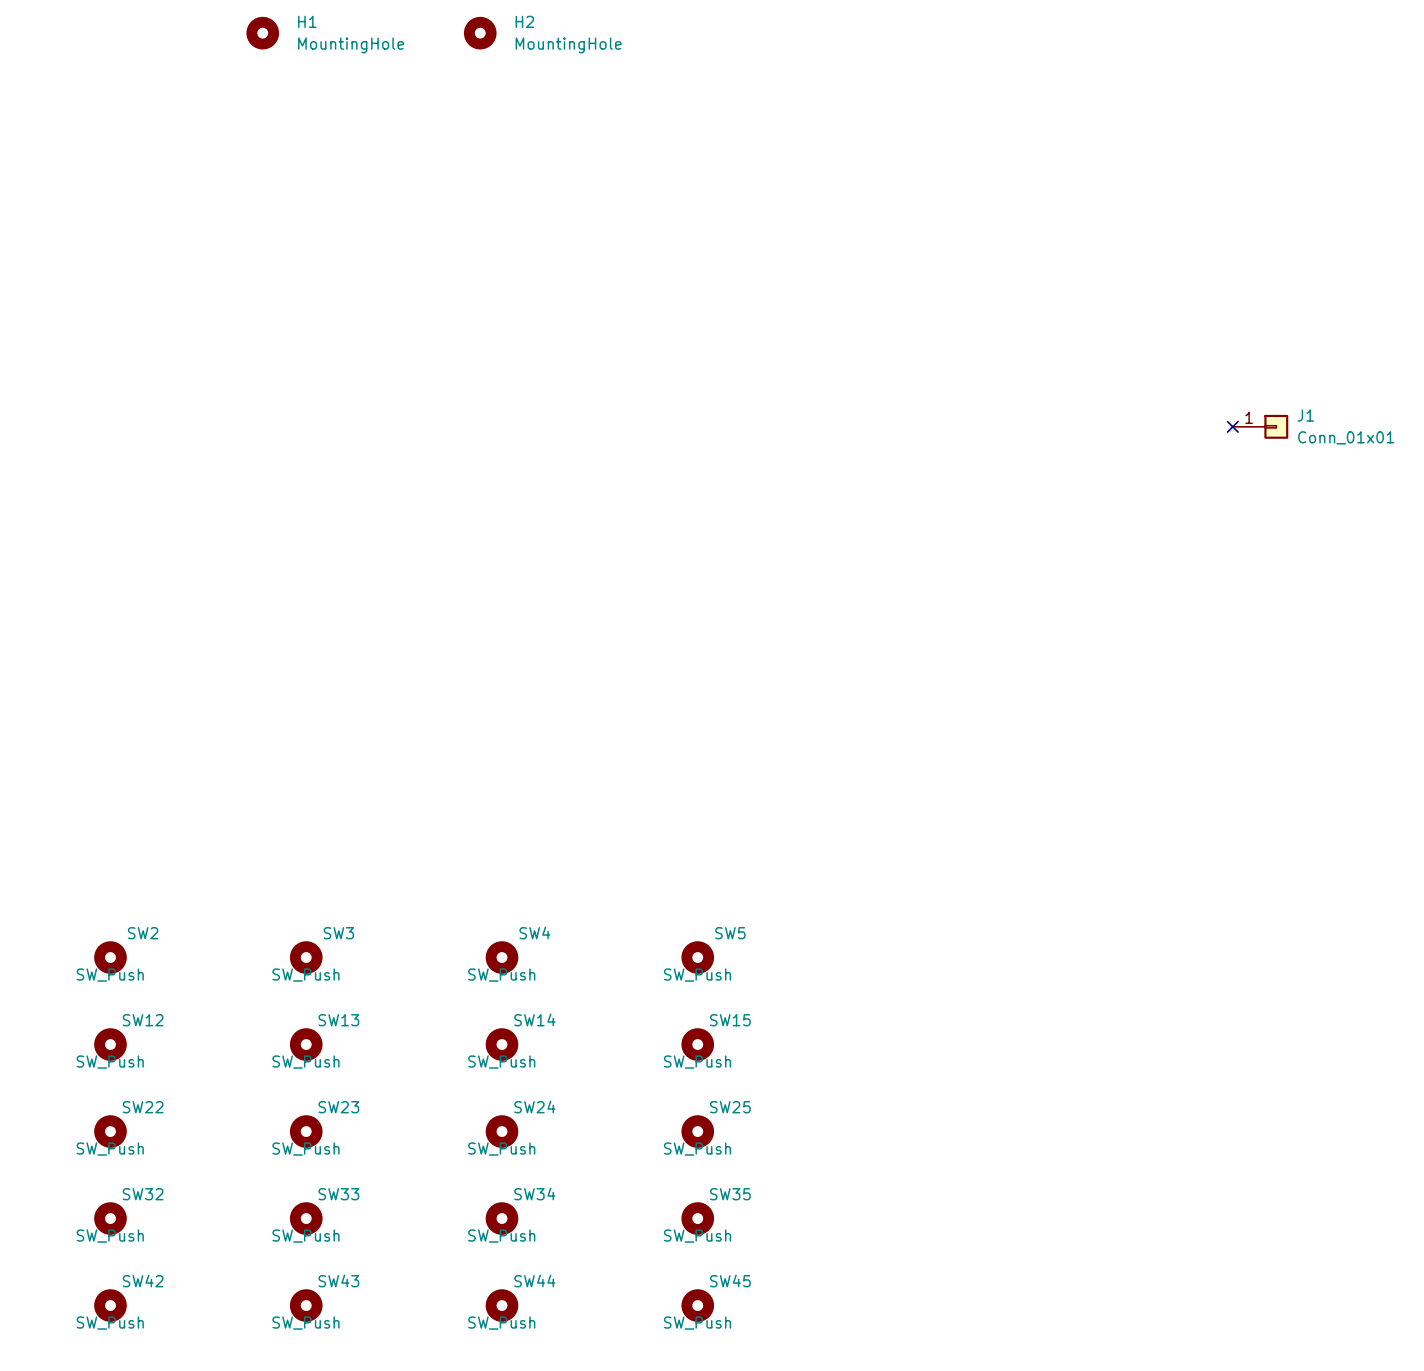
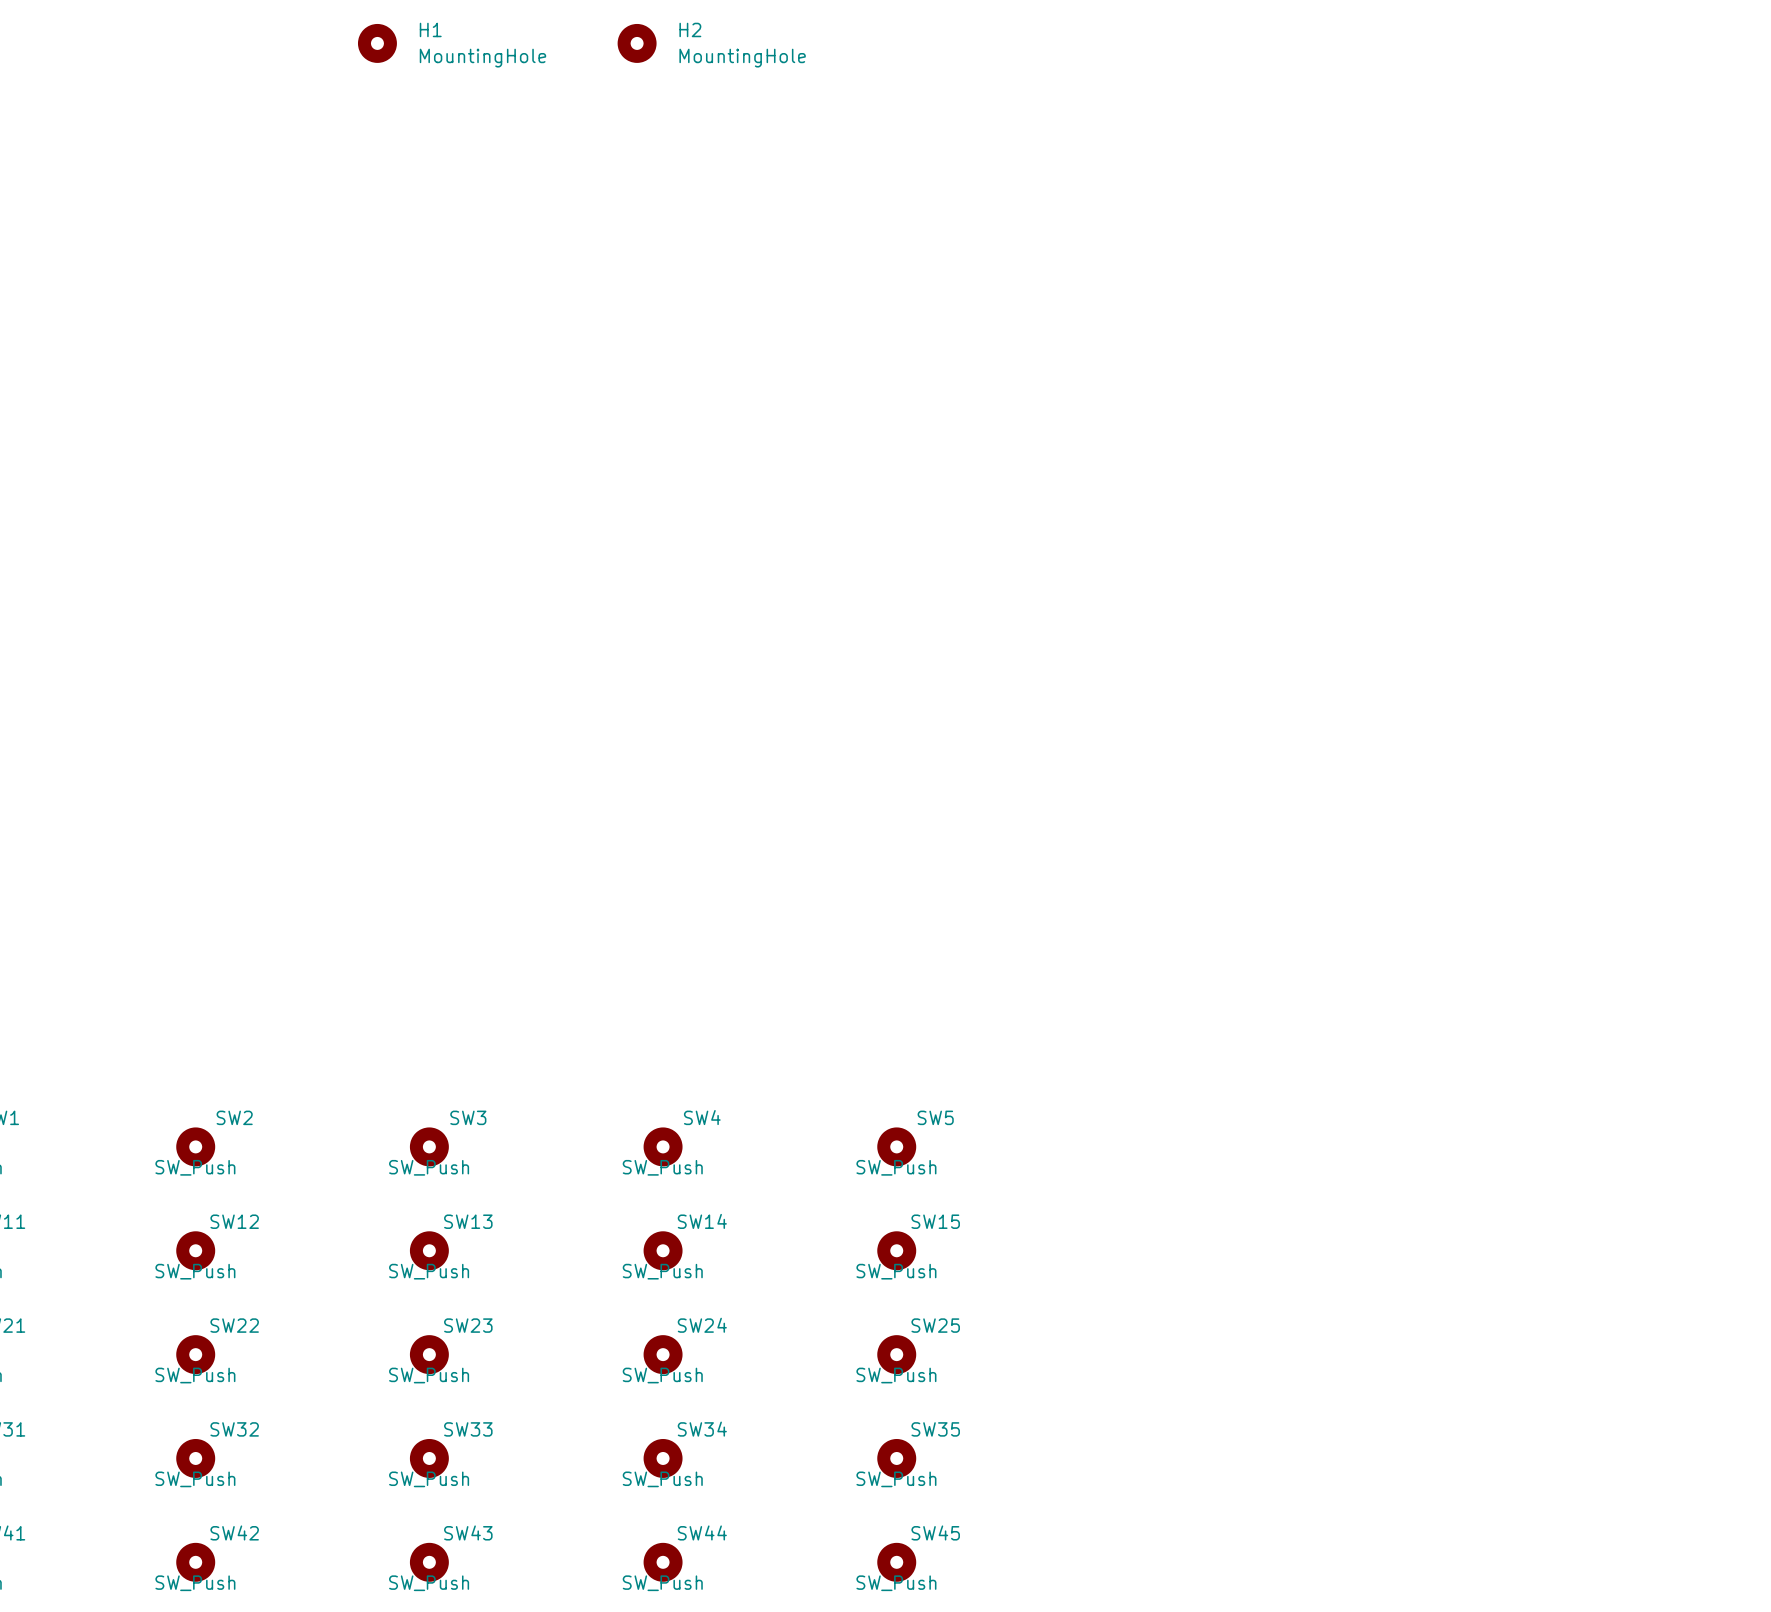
no-connect mark: (1232, 426) -> none
J1: Conn_01x01 (1260, 426) -> none

